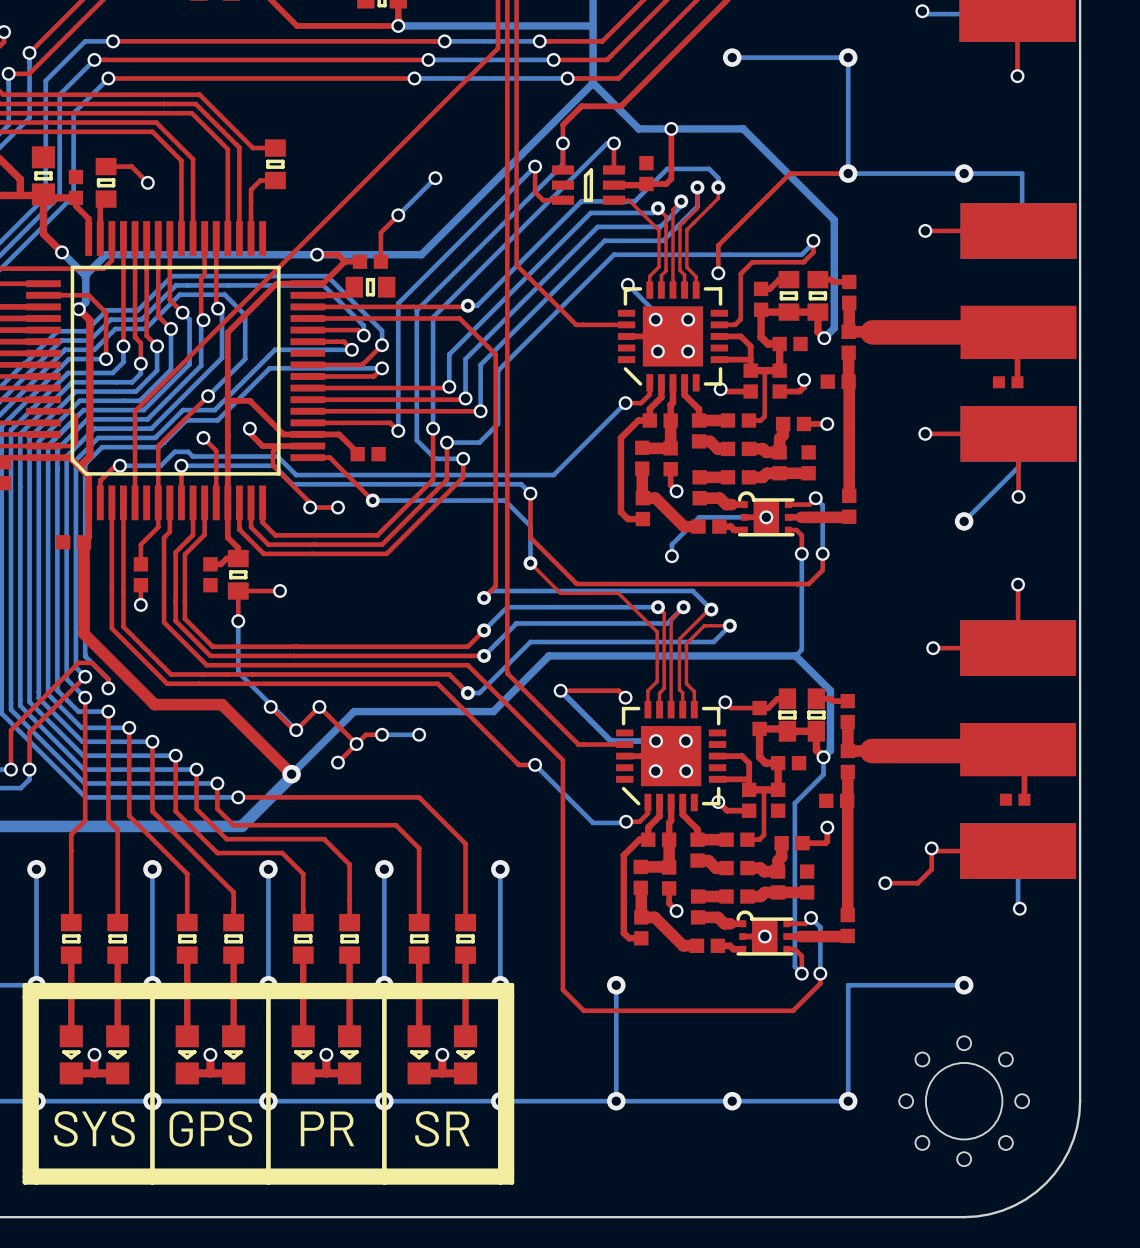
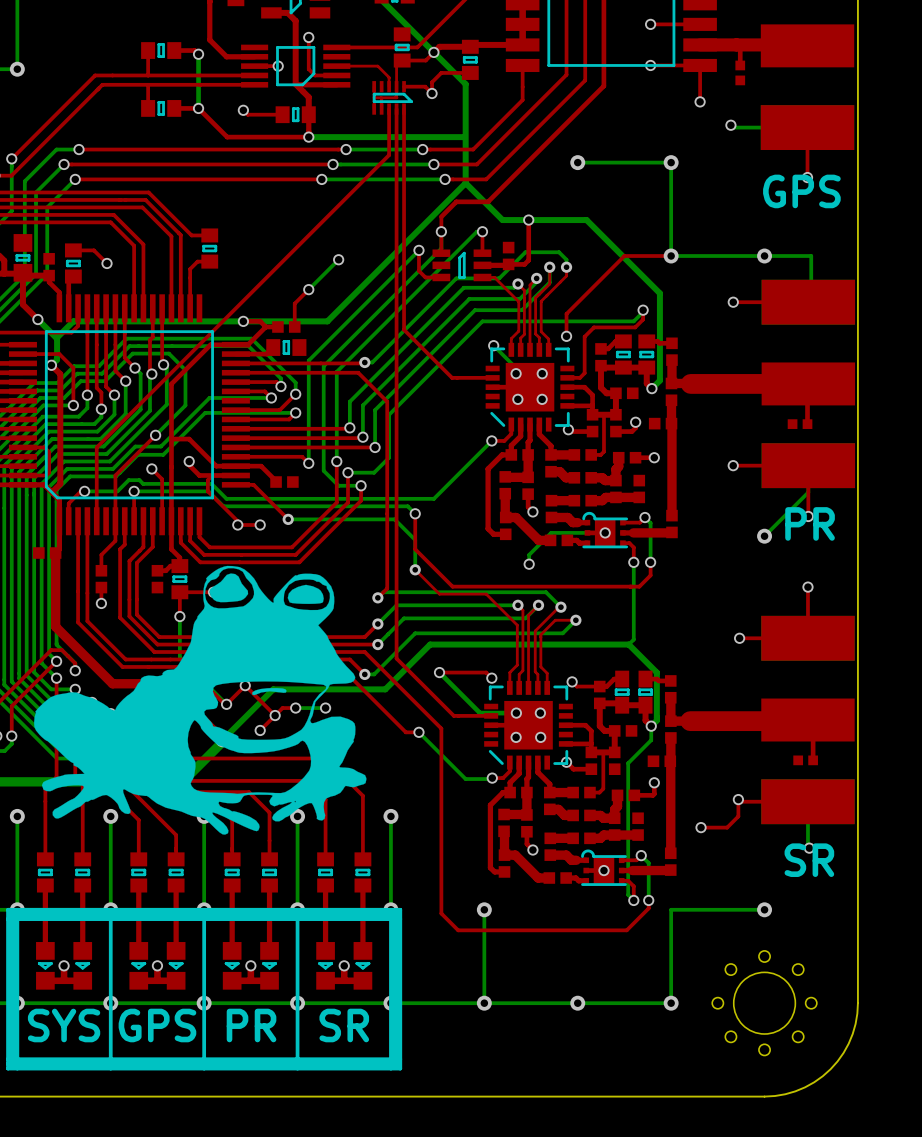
text: none -> GPS (801, 191)
text: none -> PR (810, 523)
drawing: none -> [34, 565, 367, 835]
text: none -> SR (809, 860)

